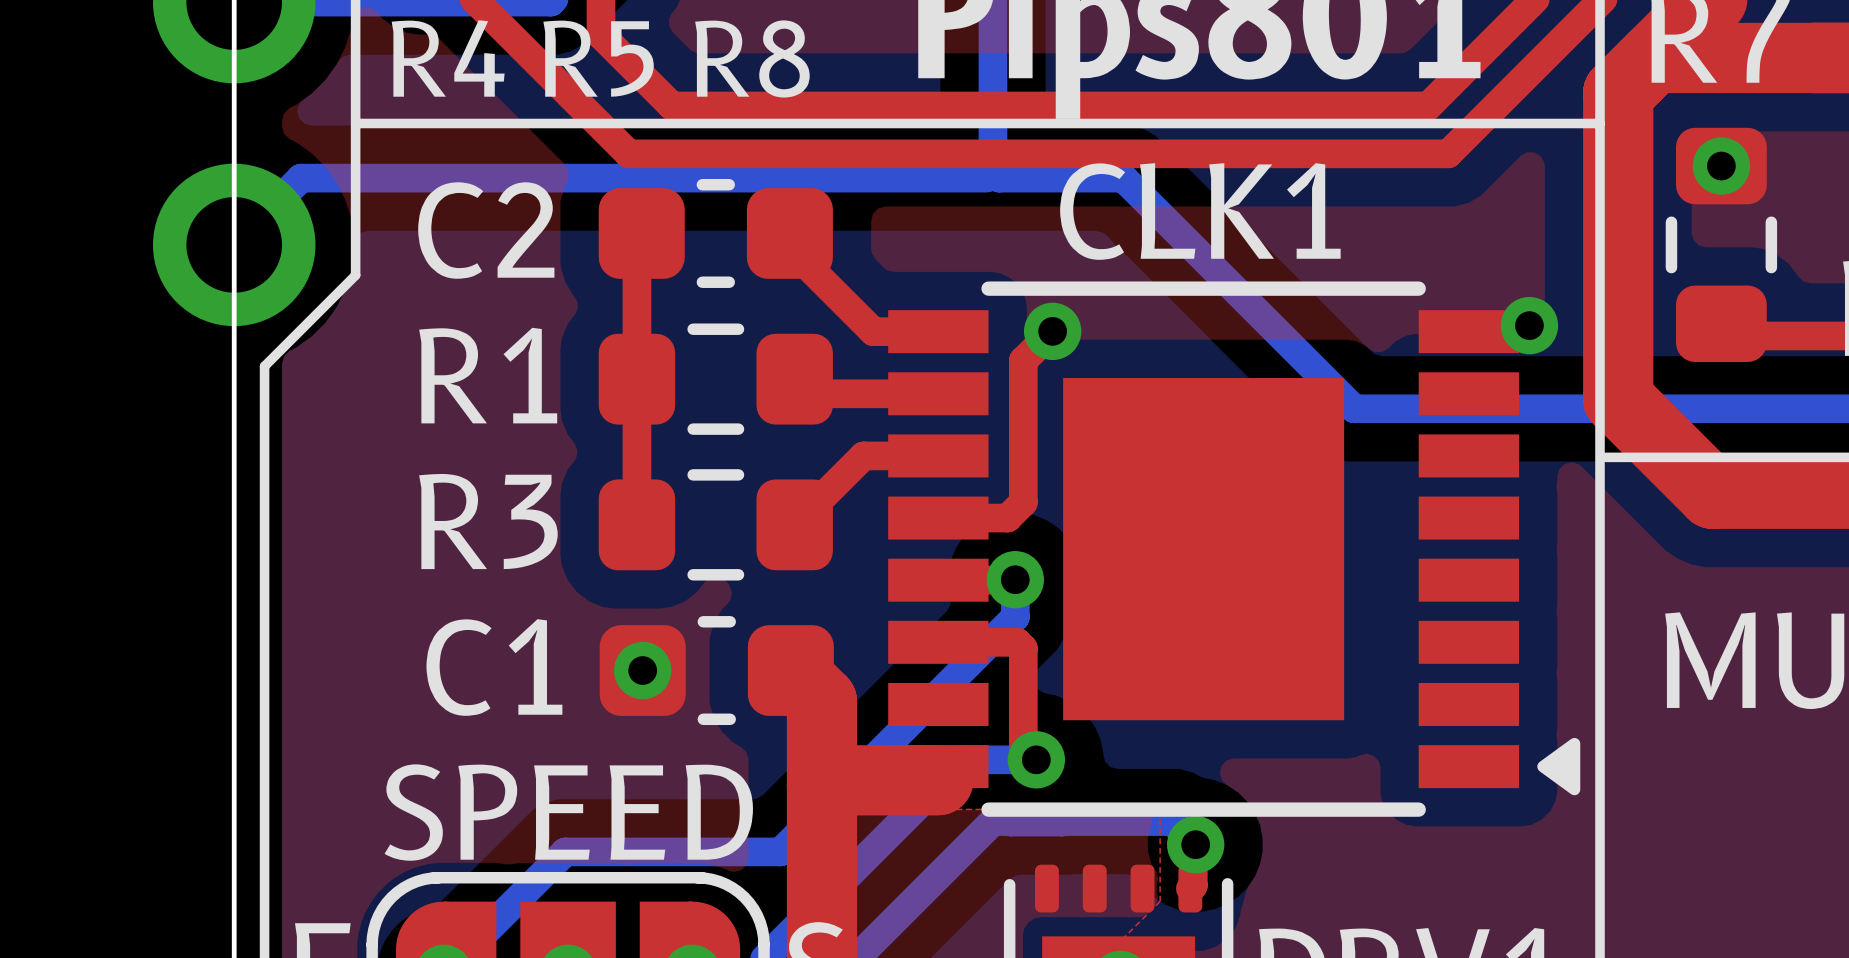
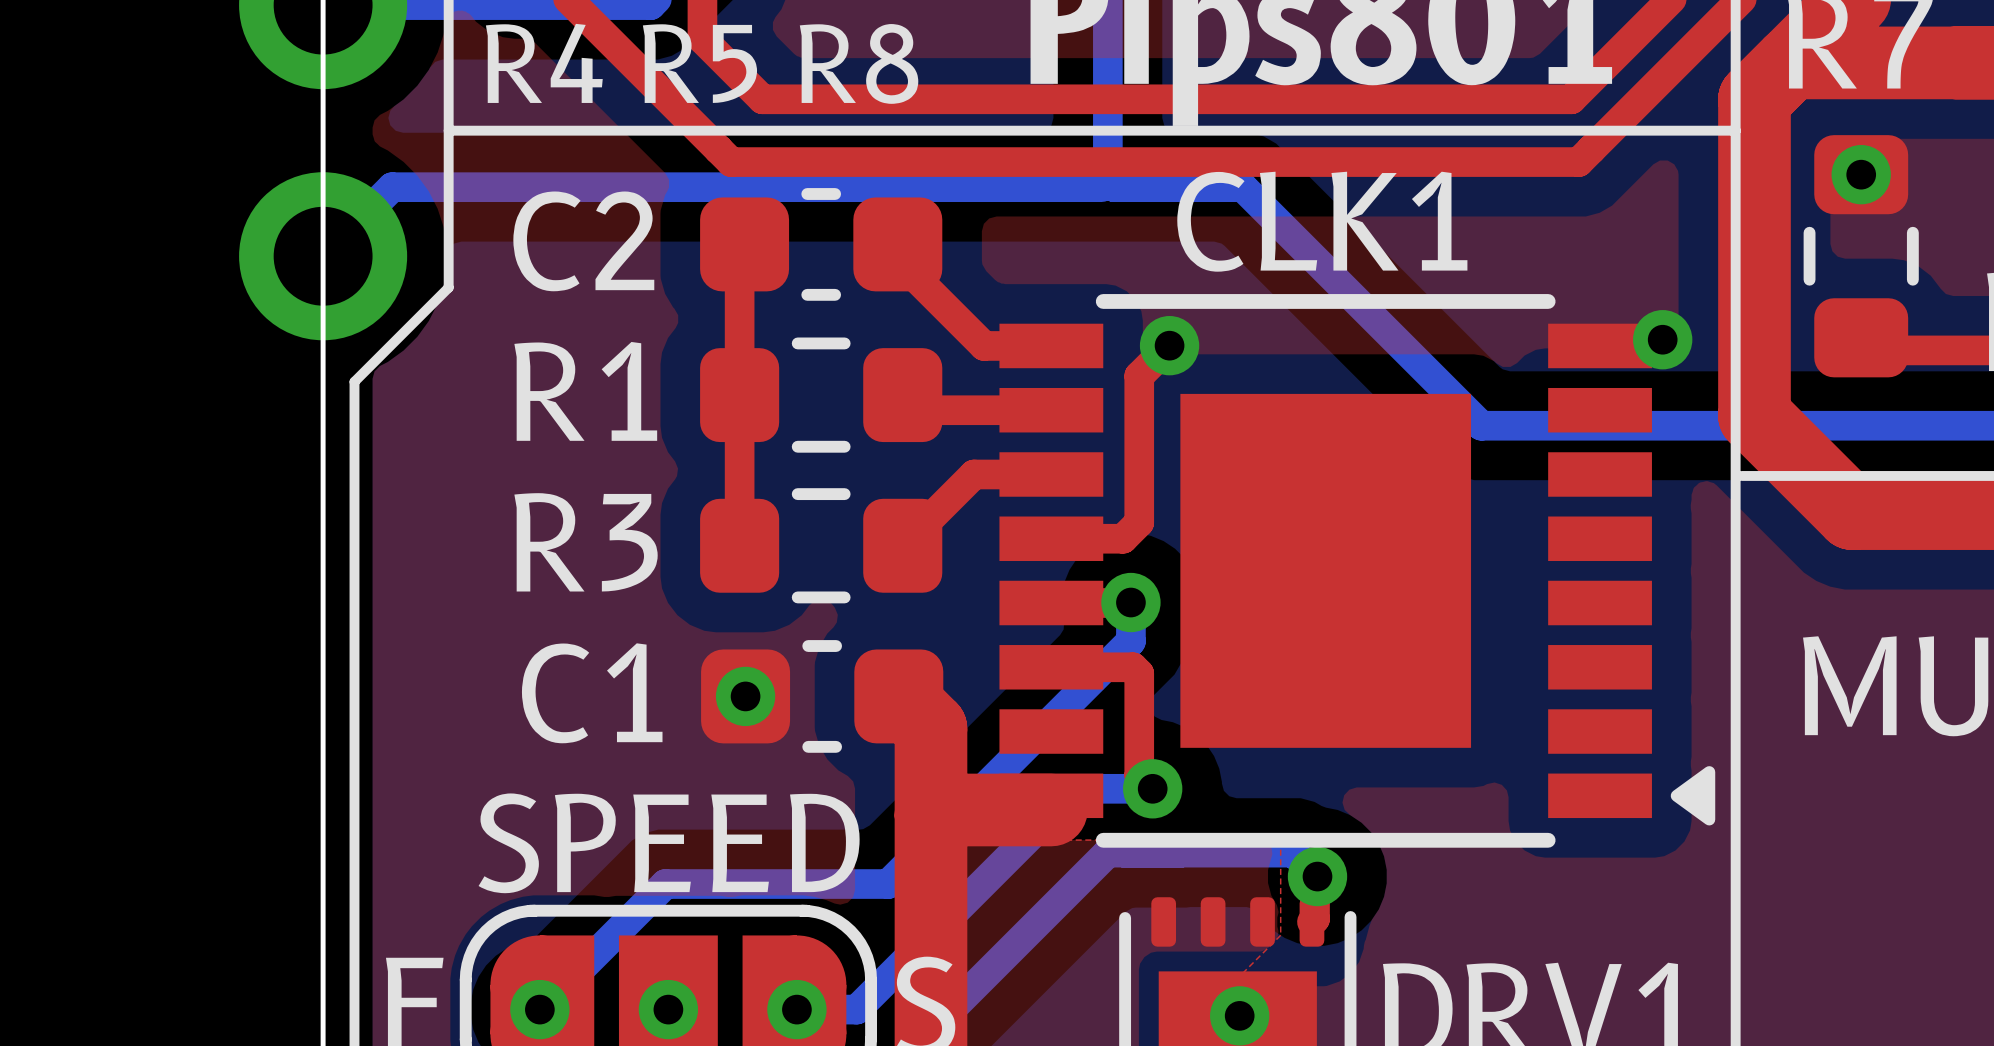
top track: (659, 93) (671, 105) (1428, 105) (1441, 93) -> (762, 99) (1571, 99)

